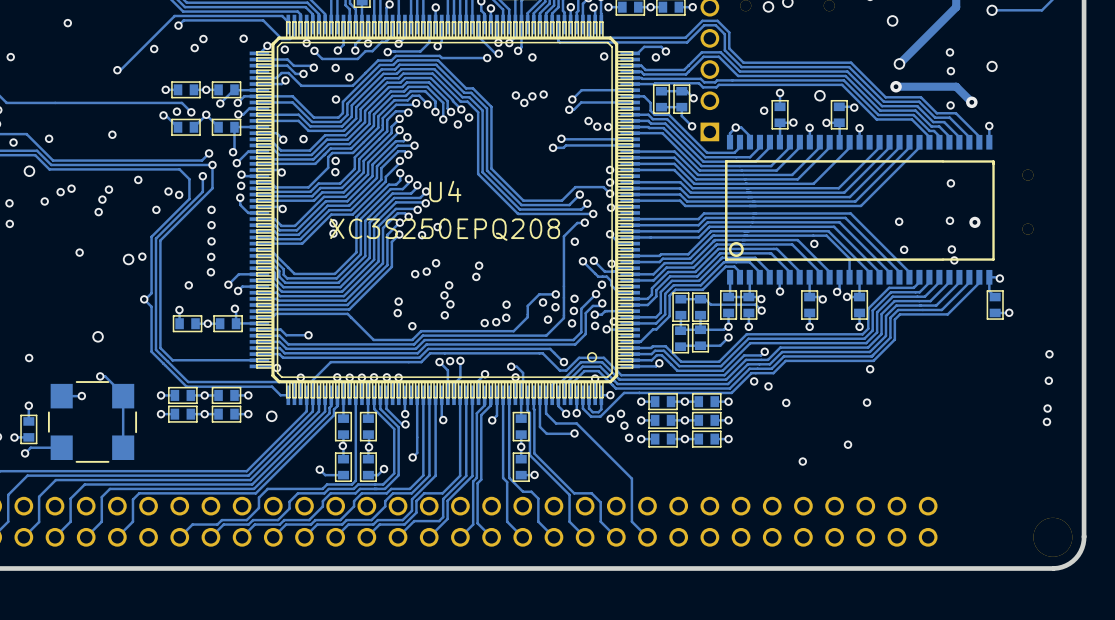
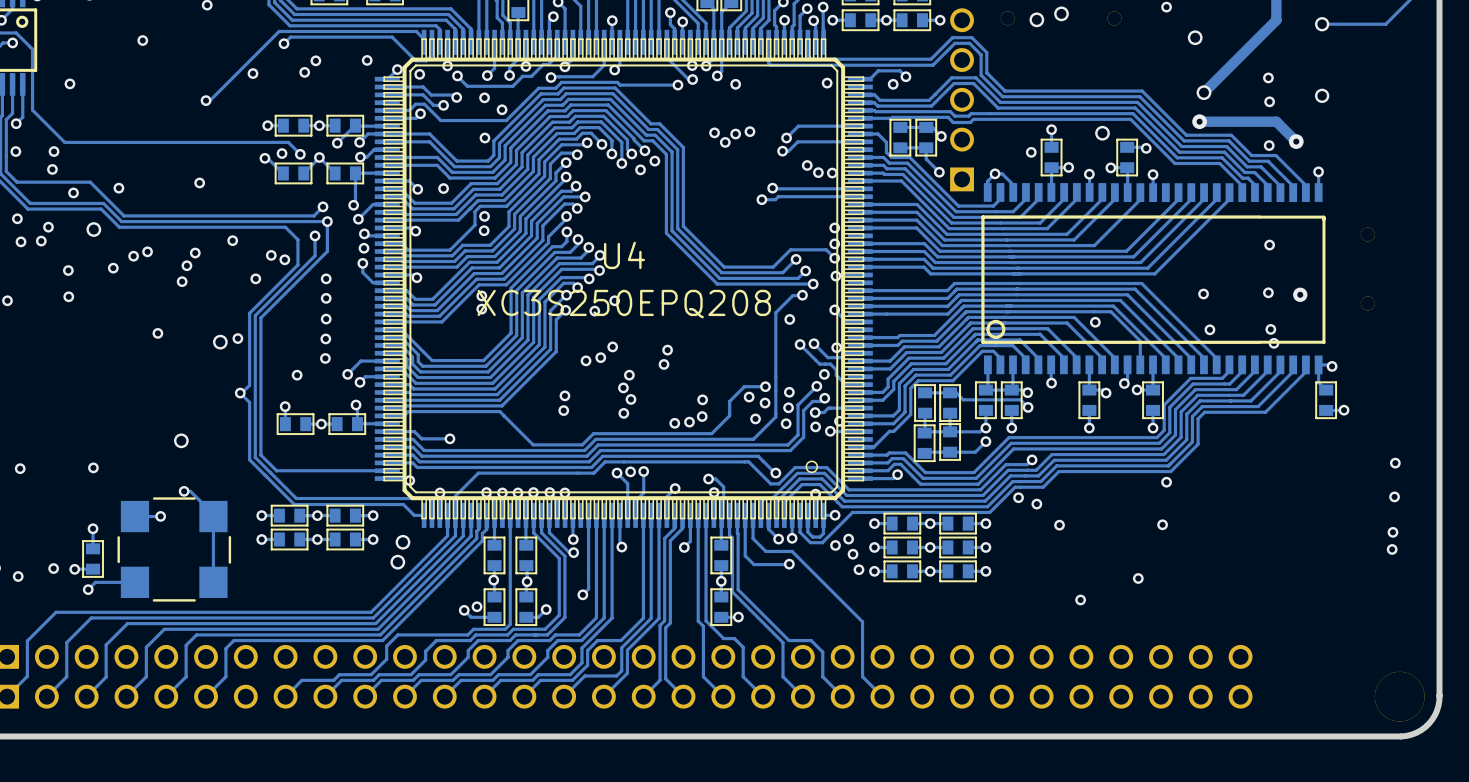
via: (412, 326) -> none
via: none -> (397, 562)
via: none -> (477, 606)

